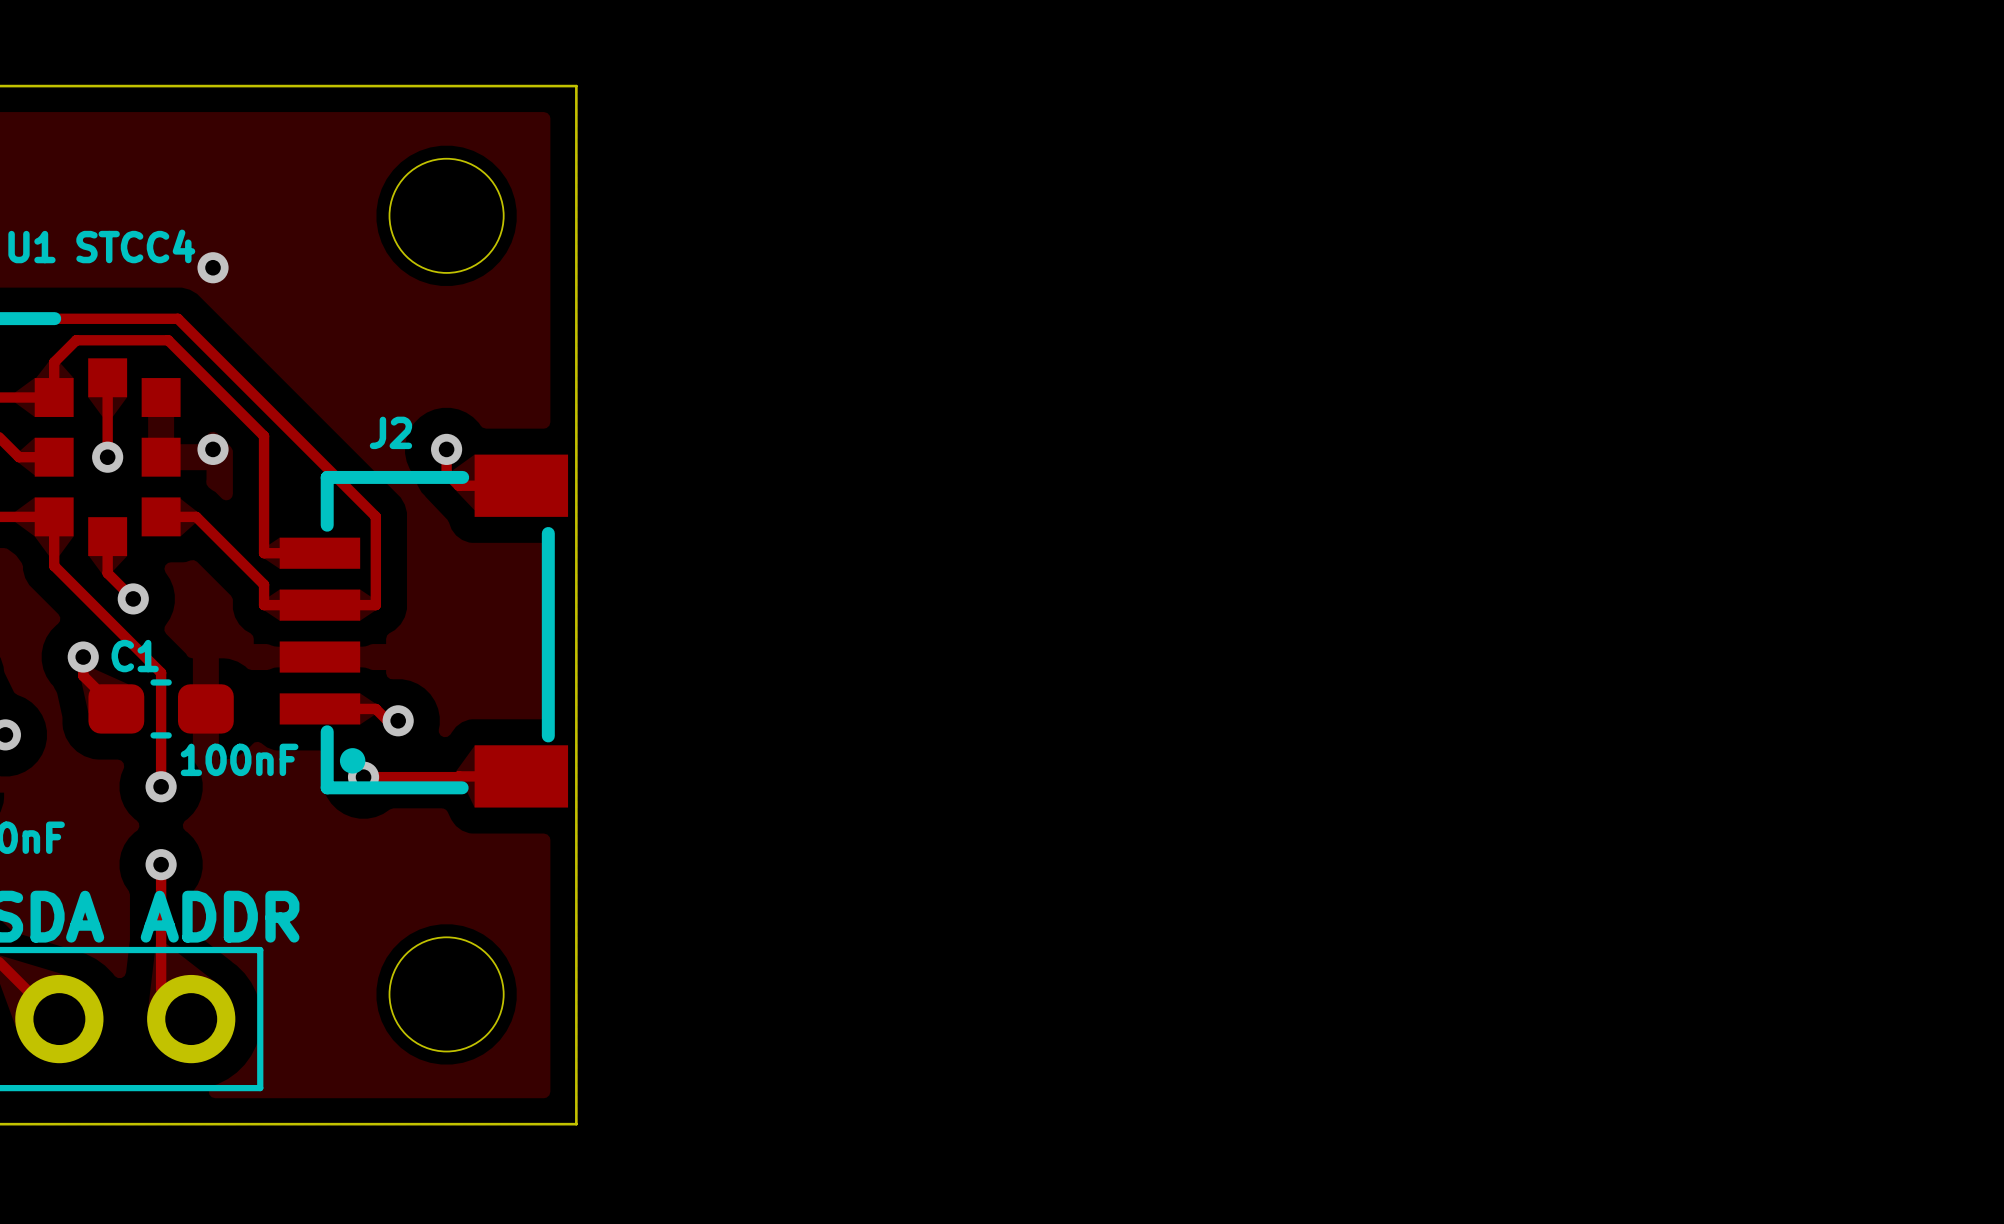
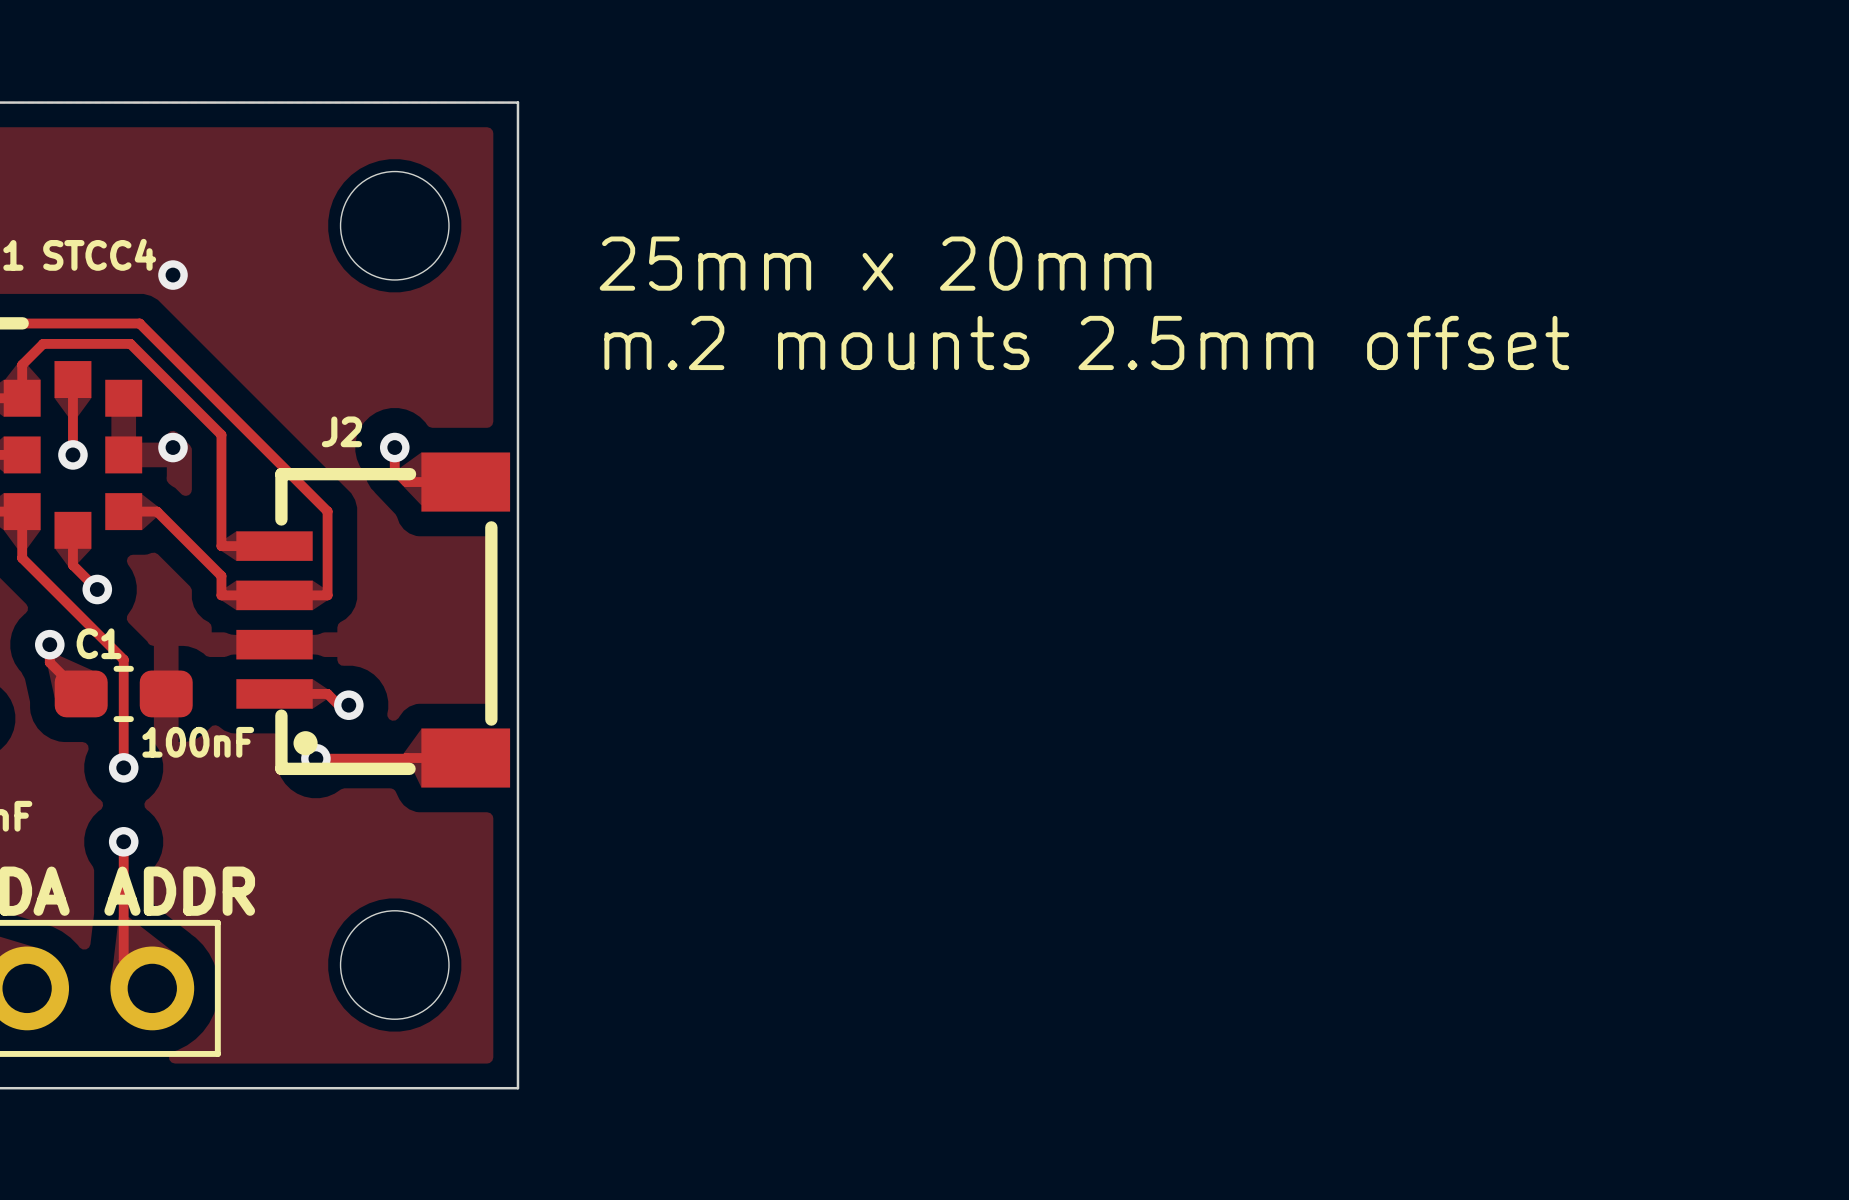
text: none -> 25mm x 20mm (875, 263)
text: none -> m.2 mounts 2.5mm offset (1086, 342)

